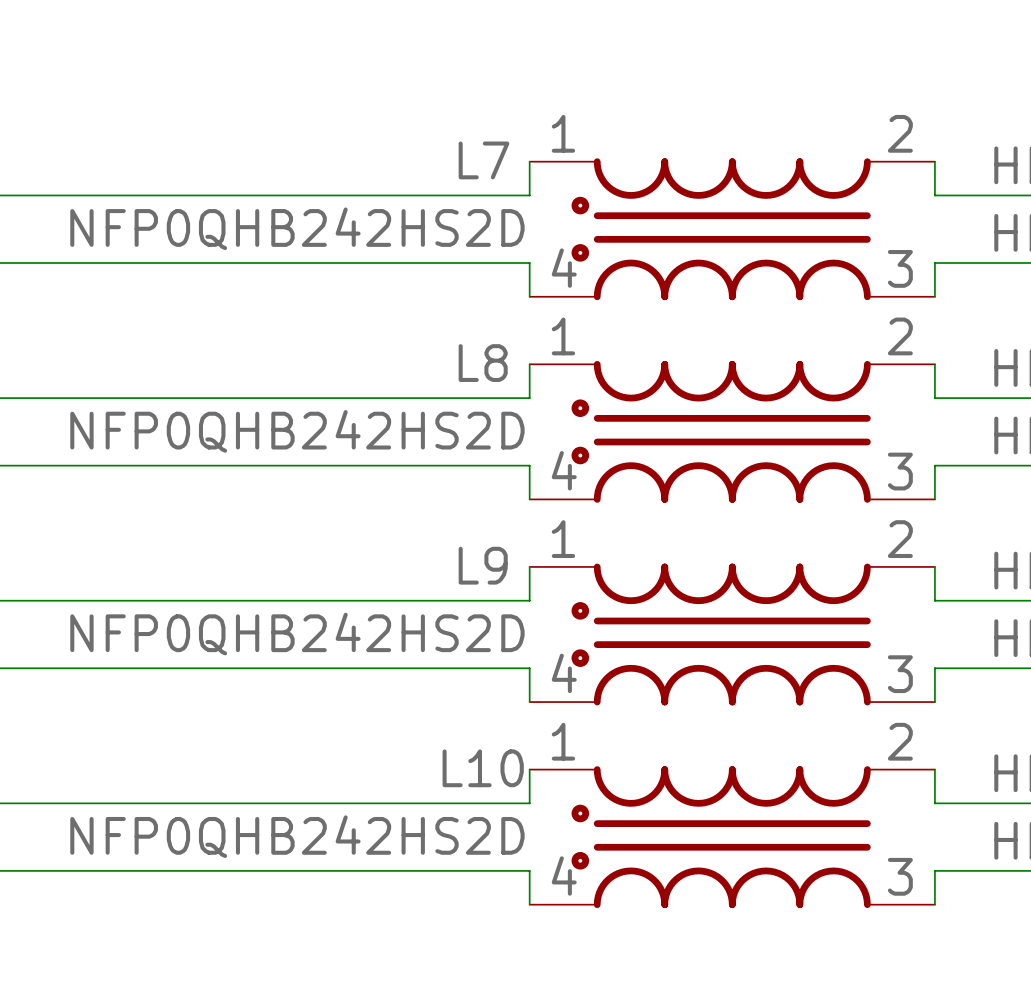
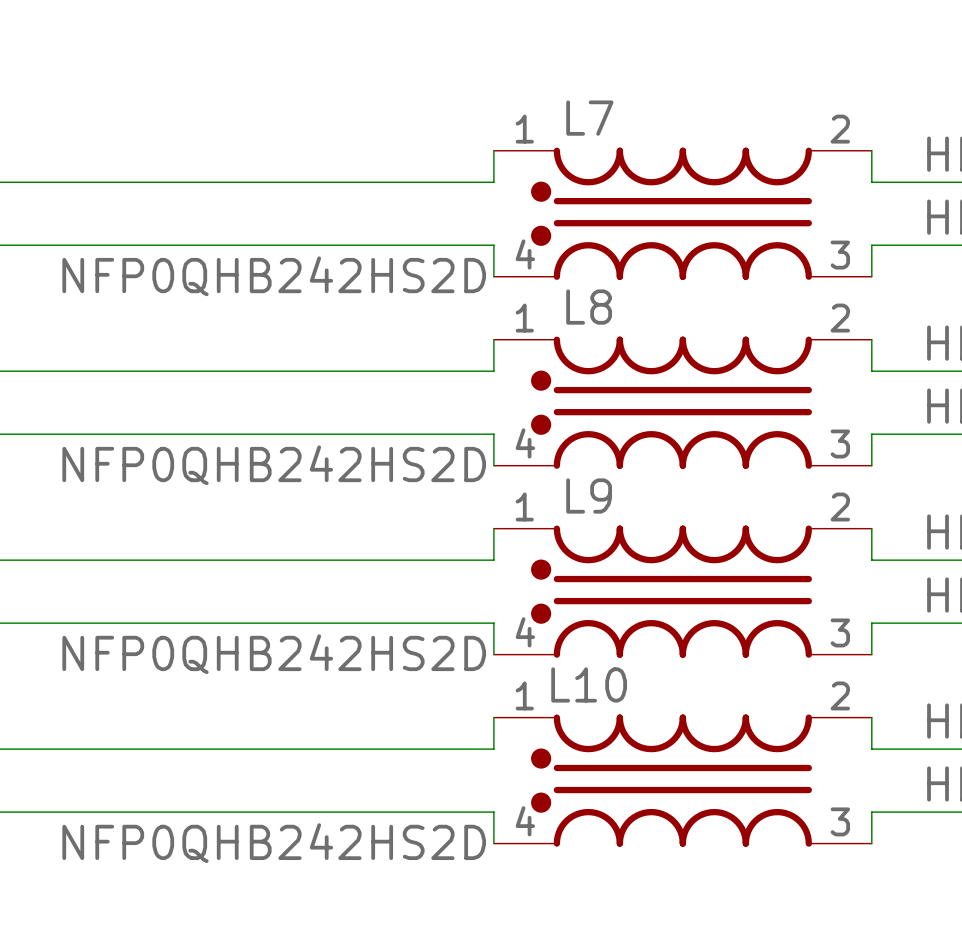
L7 symbol: [529, 158, 935, 301] -> [493, 147, 872, 280]
L7 name position: L7 (483, 160) -> L7 (589, 118)
L7 value position: NFP0QHB242HS2D (297, 228) -> NFP0QHB242HS2D (274, 276)
L8 symbol: [529, 360, 935, 503] -> [493, 336, 872, 469]
L8 name position: L8 (483, 363) -> L8 (589, 307)
L8 value position: NFP0QHB242HS2D (297, 431) -> NFP0QHB242HS2D (274, 465)
L9 symbol: [529, 563, 935, 706] -> [493, 525, 872, 658]
L9 name position: L9 (483, 565) -> L9 (589, 495)
L9 value position: NFP0QHB242HS2D (297, 634) -> NFP0QHB242HS2D (274, 654)
L10 symbol: [529, 766, 935, 909] -> [493, 714, 872, 847]
L10 name position: L10 (483, 768) -> L10 (589, 684)
L10 value position: NFP0QHB242HS2D (297, 836) -> NFP0QHB242HS2D (274, 843)

